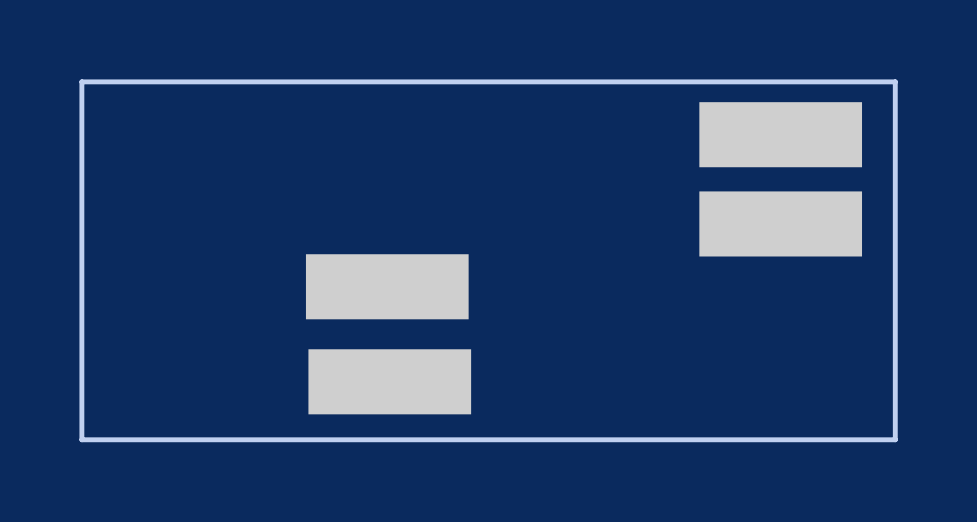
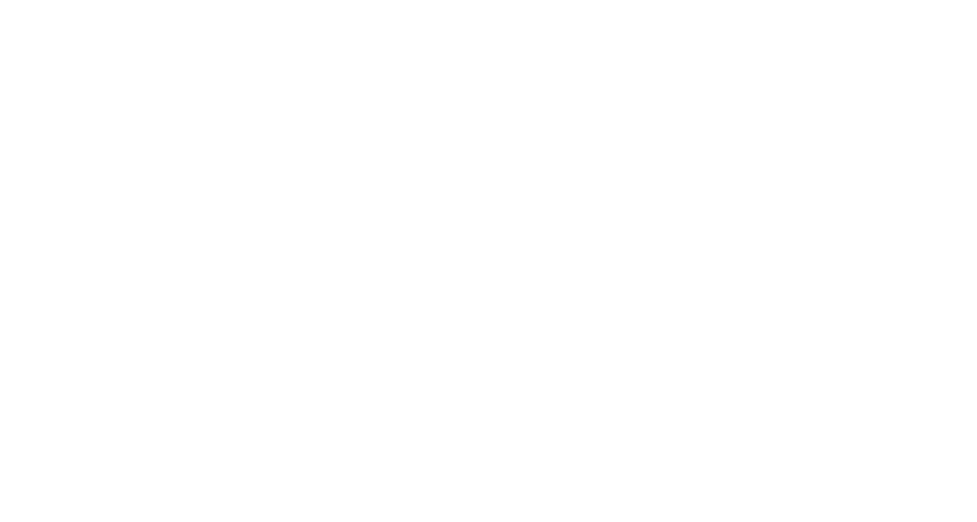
board edge: (895, 81) (895, 439) (81, 439) (81, 81) (895, 81) -> none
part: (780, 134) -> none
part: (780, 223) -> none
part: (387, 286) -> none
part: (389, 381) -> none

